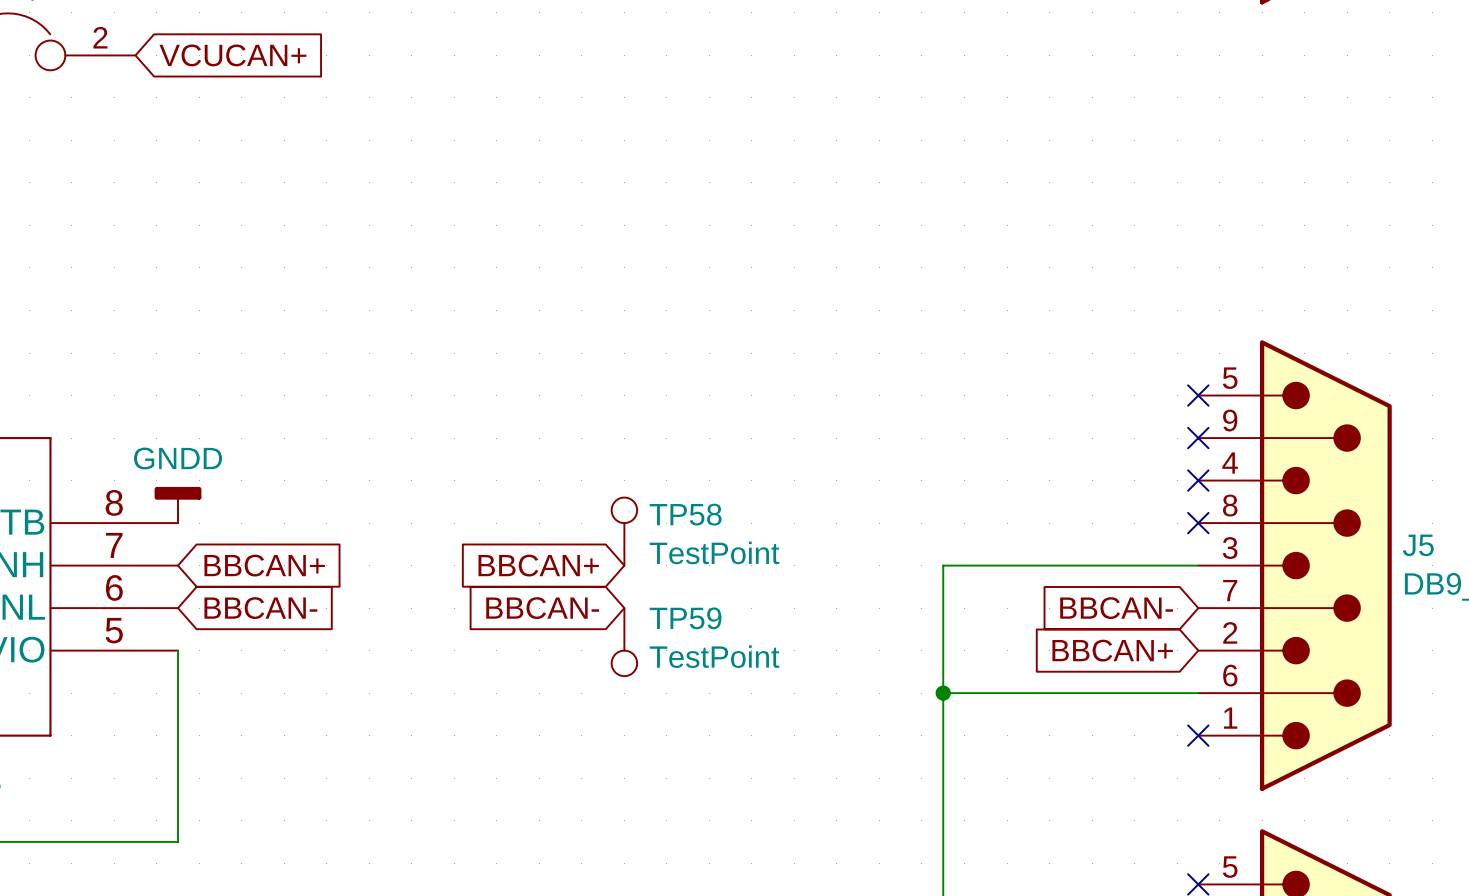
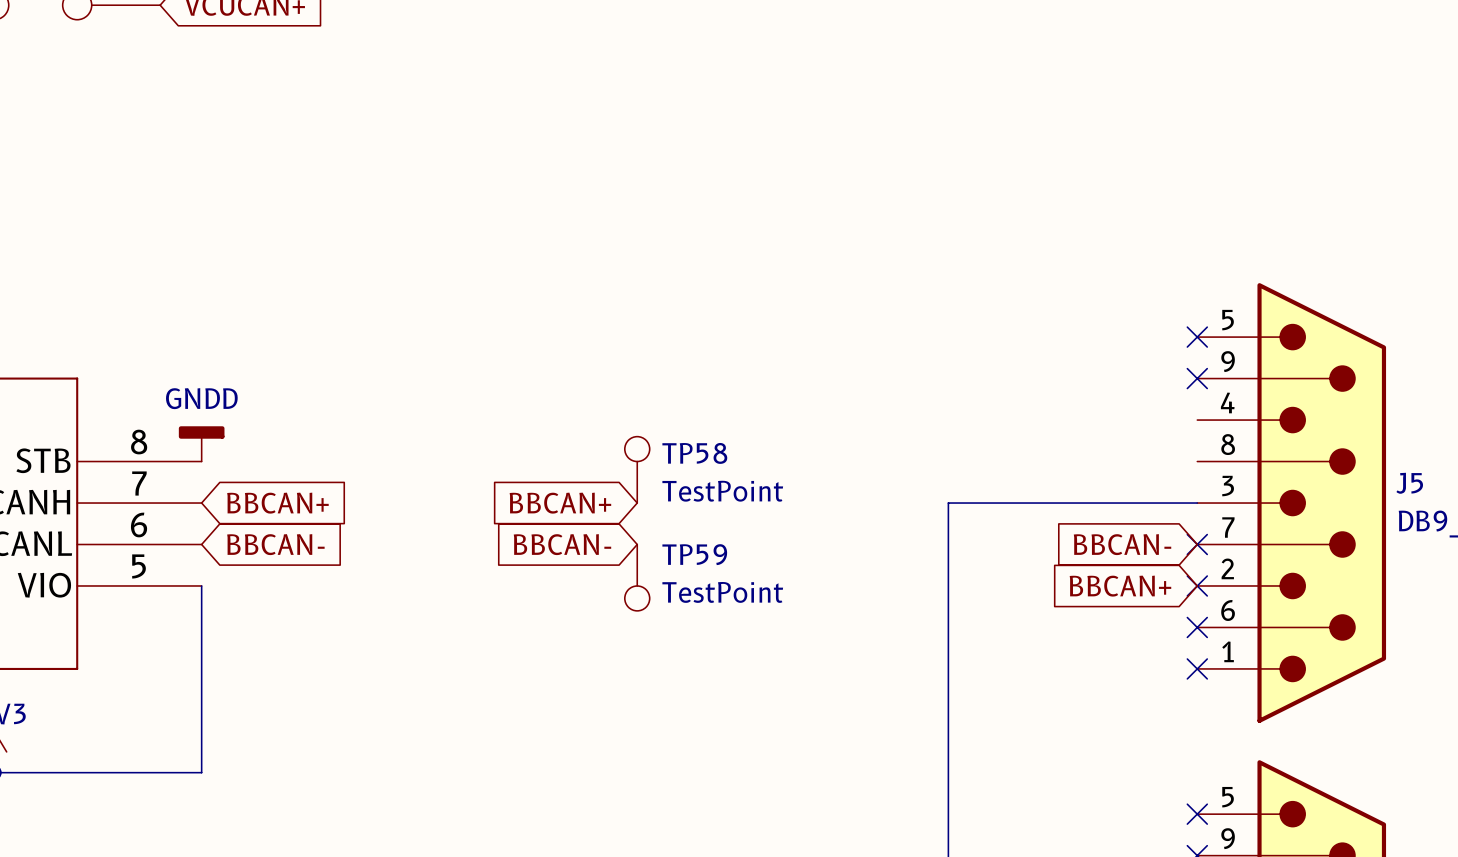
no-connect mark: (1198, 480) -> none
no-connect mark: (1198, 523) -> none
no-connect mark: none -> (1197, 544)
no-connect mark: none -> (1197, 585)
wire: (943, 693) (1198, 693) -> none
junction: (943, 693) -> none
no-connect mark: none -> (1197, 627)

